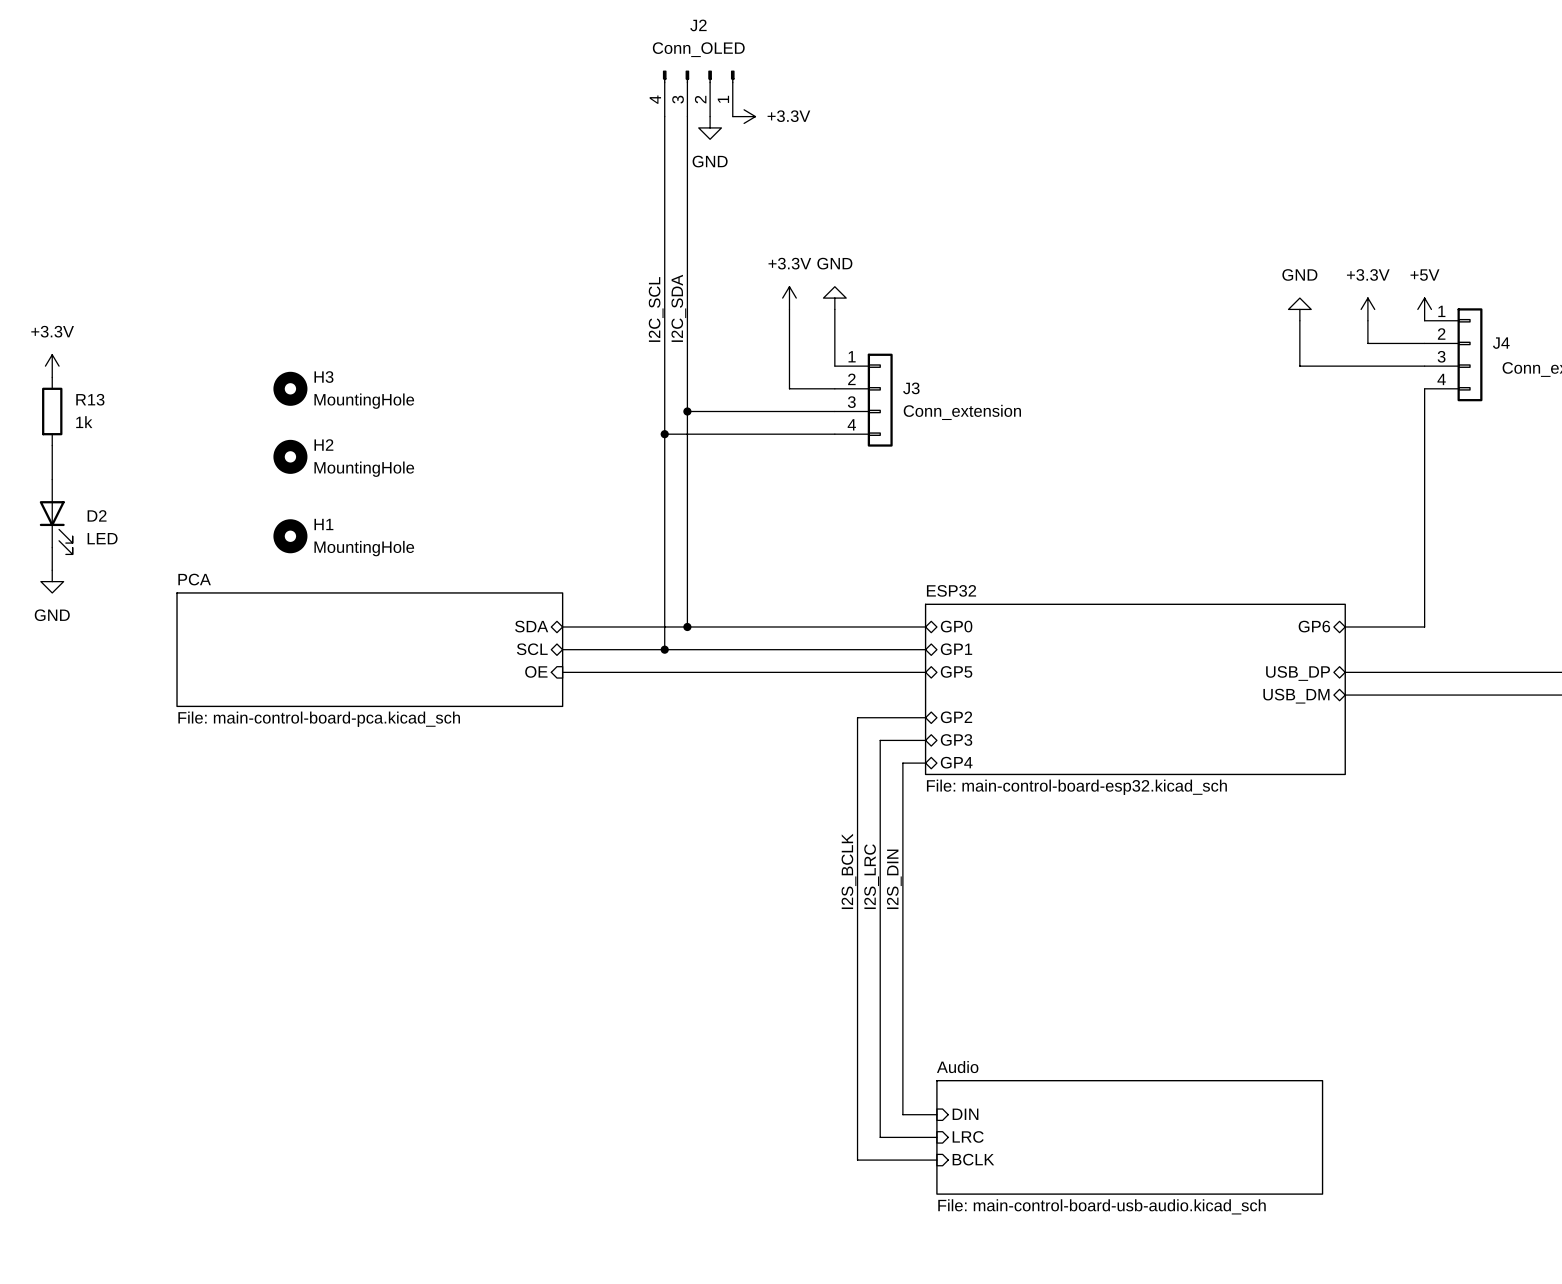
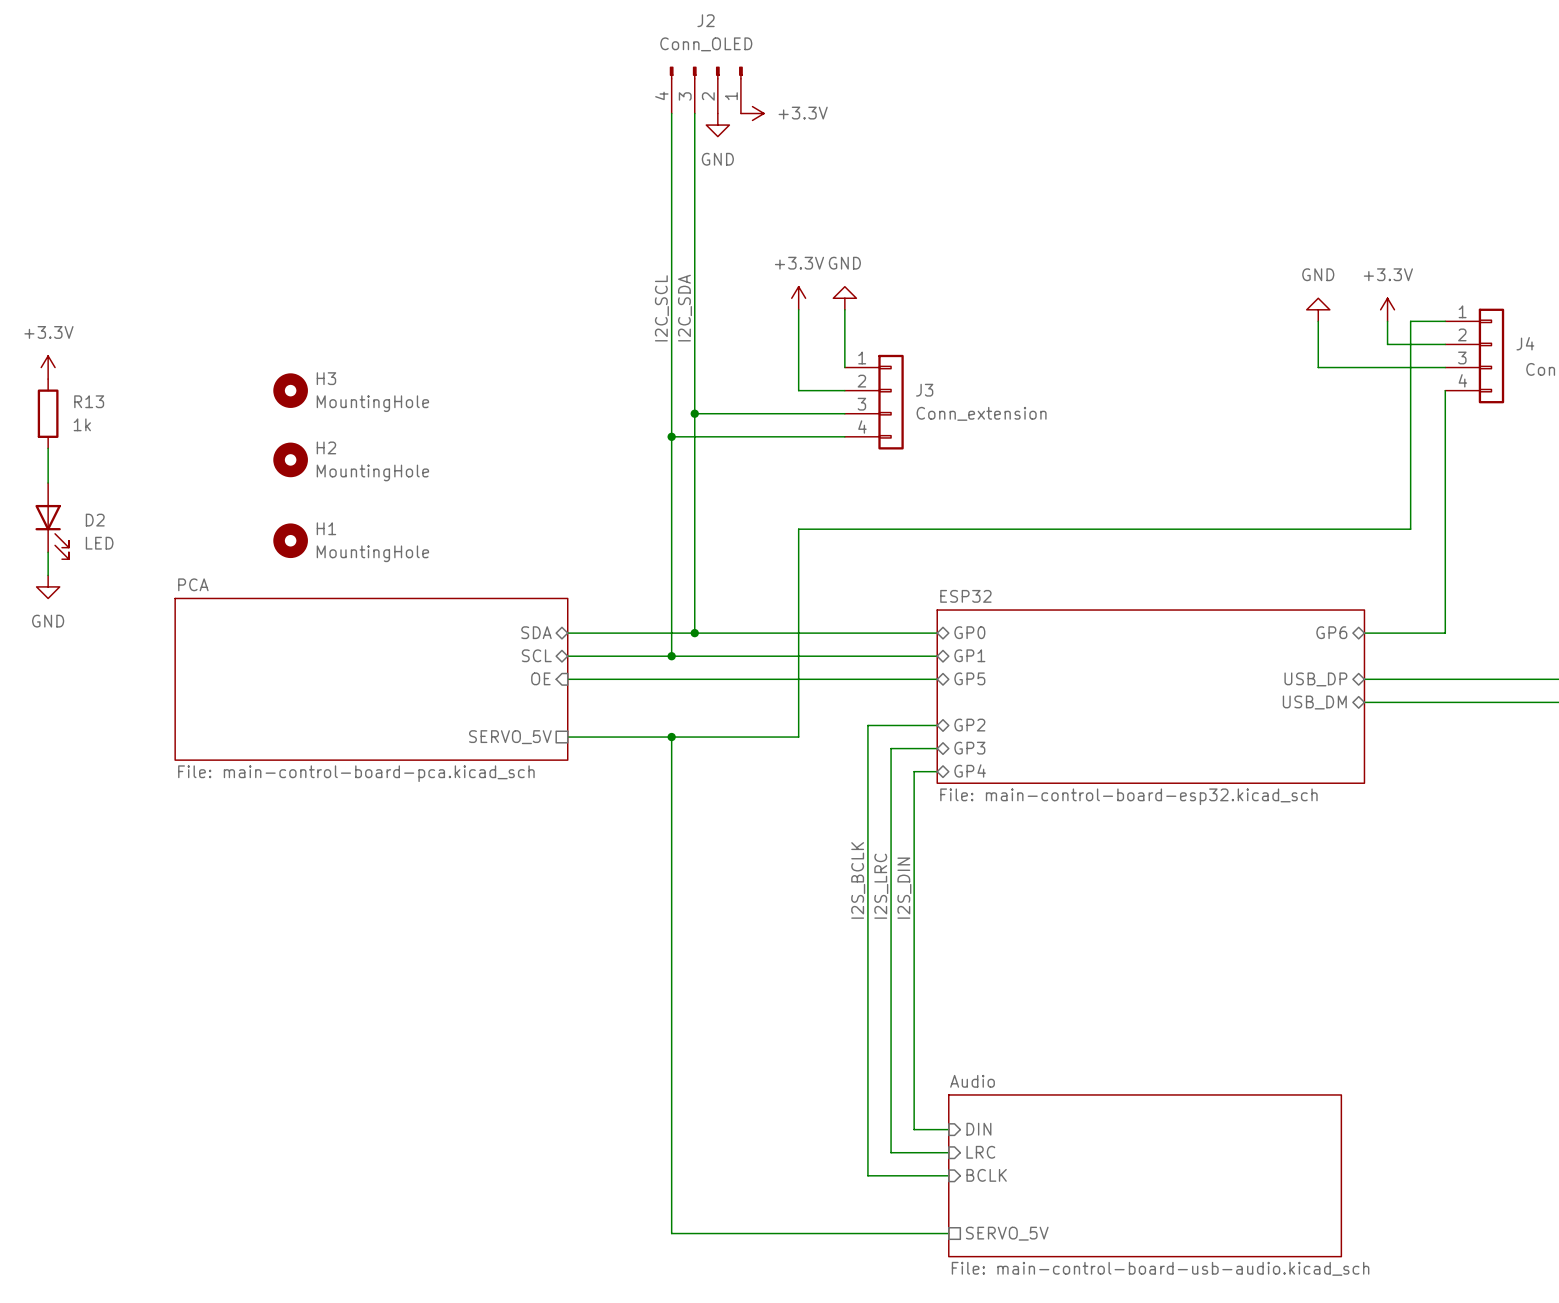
power symbol: +5V (1424, 309) -> none
wire: none -> (1445, 321) (1410, 321) (1410, 529) (798, 529) (798, 737) (567, 737)
sheet PCA: File: main-control-board-pca.kicad_sch (369, 649) -> none
sheet PCA: none -> File: main-control-board-pca.kicad_sch (371, 679)
wire: none -> (671, 737) (671, 1233) (948, 1233)
junction: none -> (671, 737)
sheet pin: none -> SERVO_5V (510, 737)
sheet Audio: File: main-control-board-usb-audio.kicad_sch (1129, 1137) -> none
sheet Audio: none -> File: main-control-board-usb-audio.kicad_sch (1145, 1175)
sheet pin: none -> SERVO_5V (1007, 1233)

